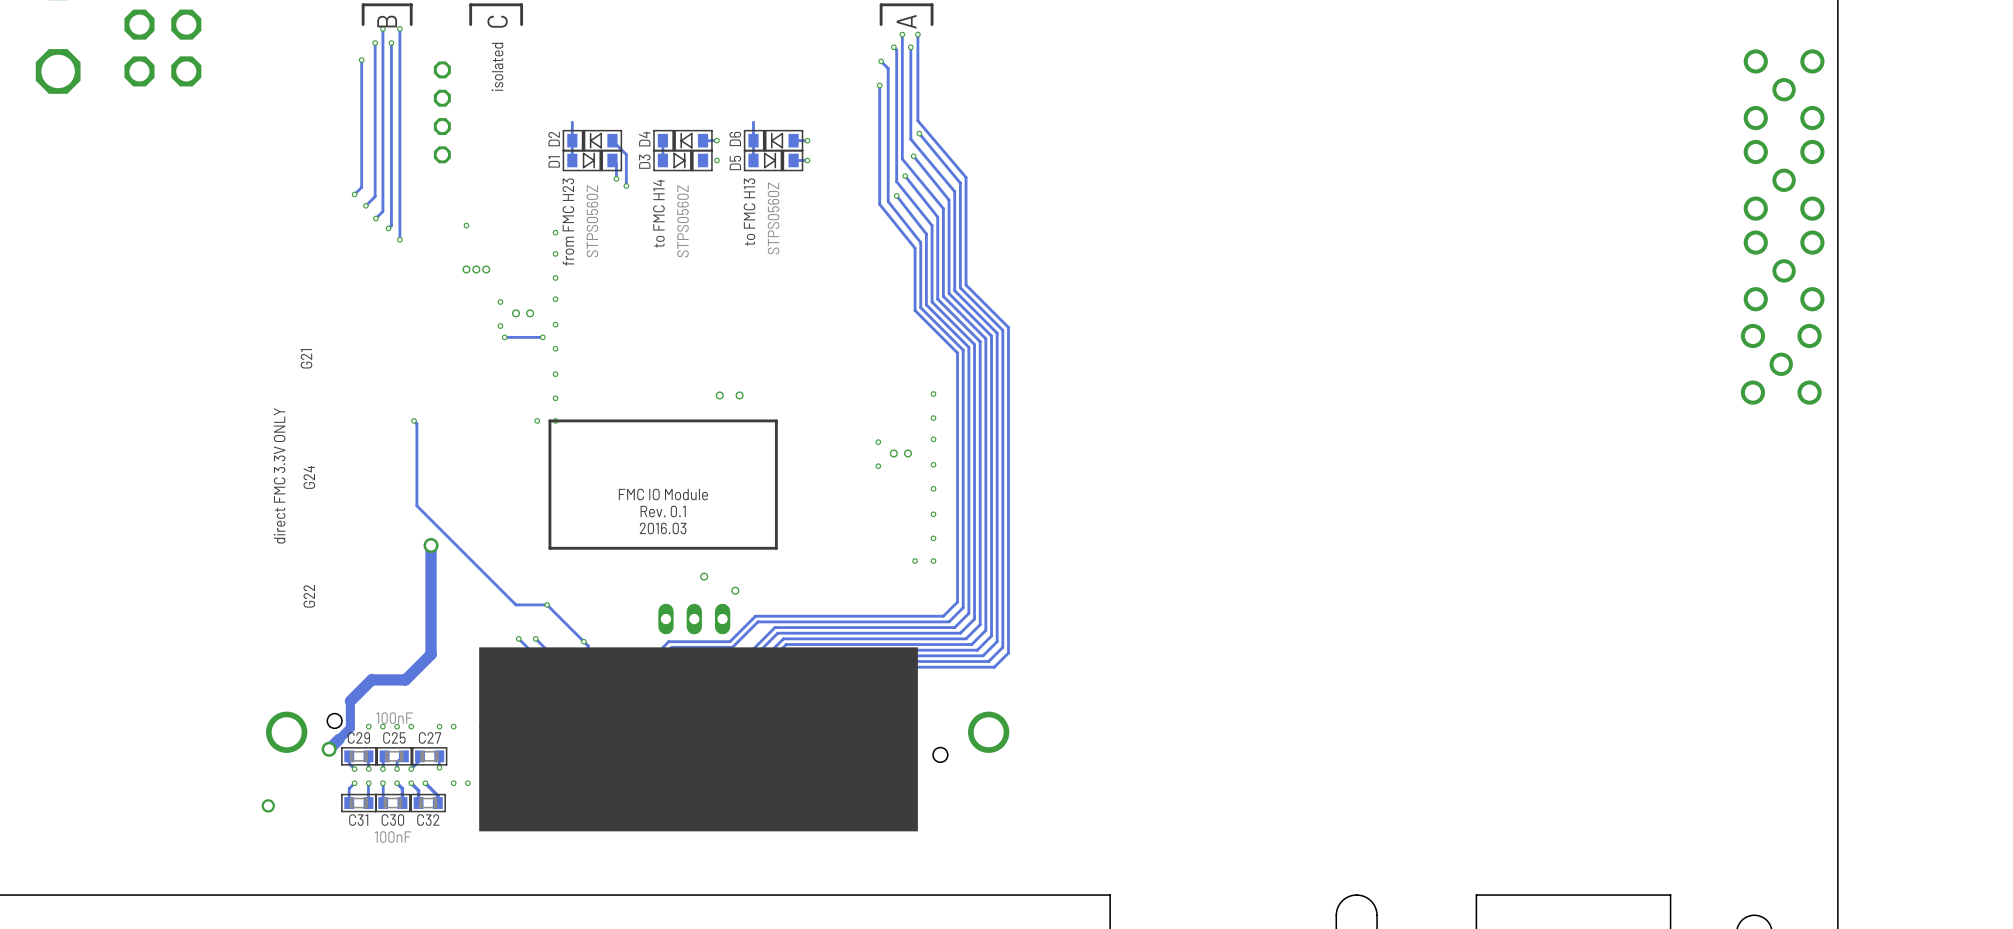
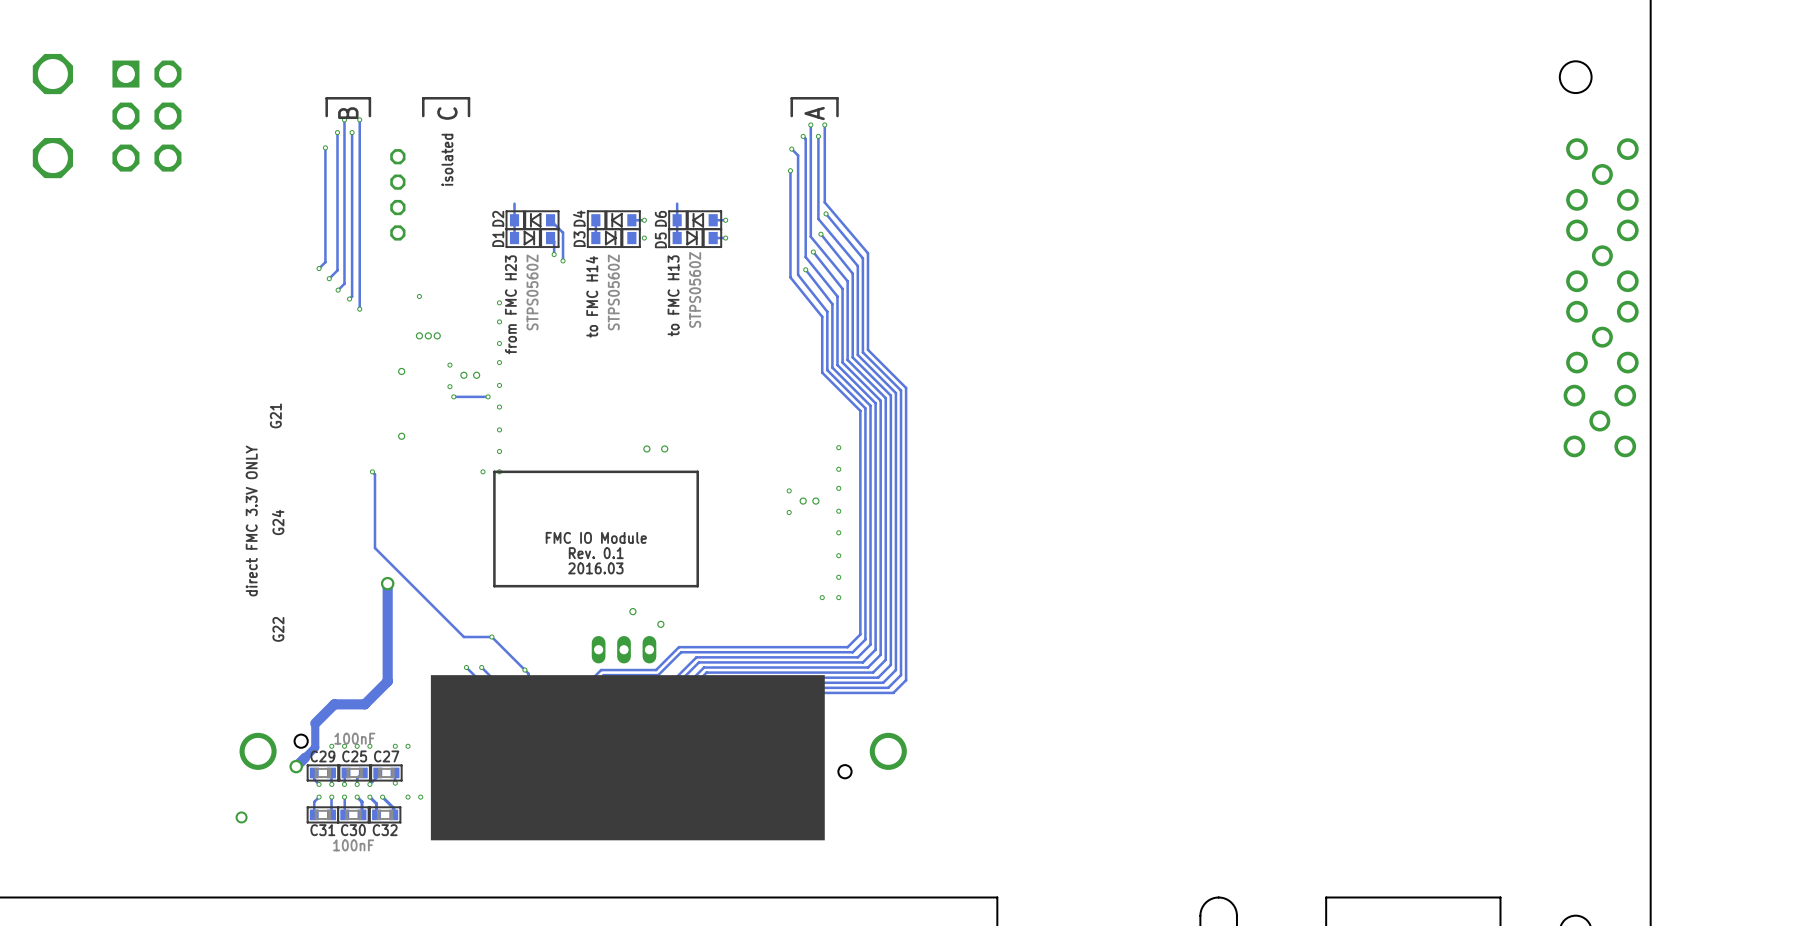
via: none -> (401, 371)
via: none -> (401, 436)

